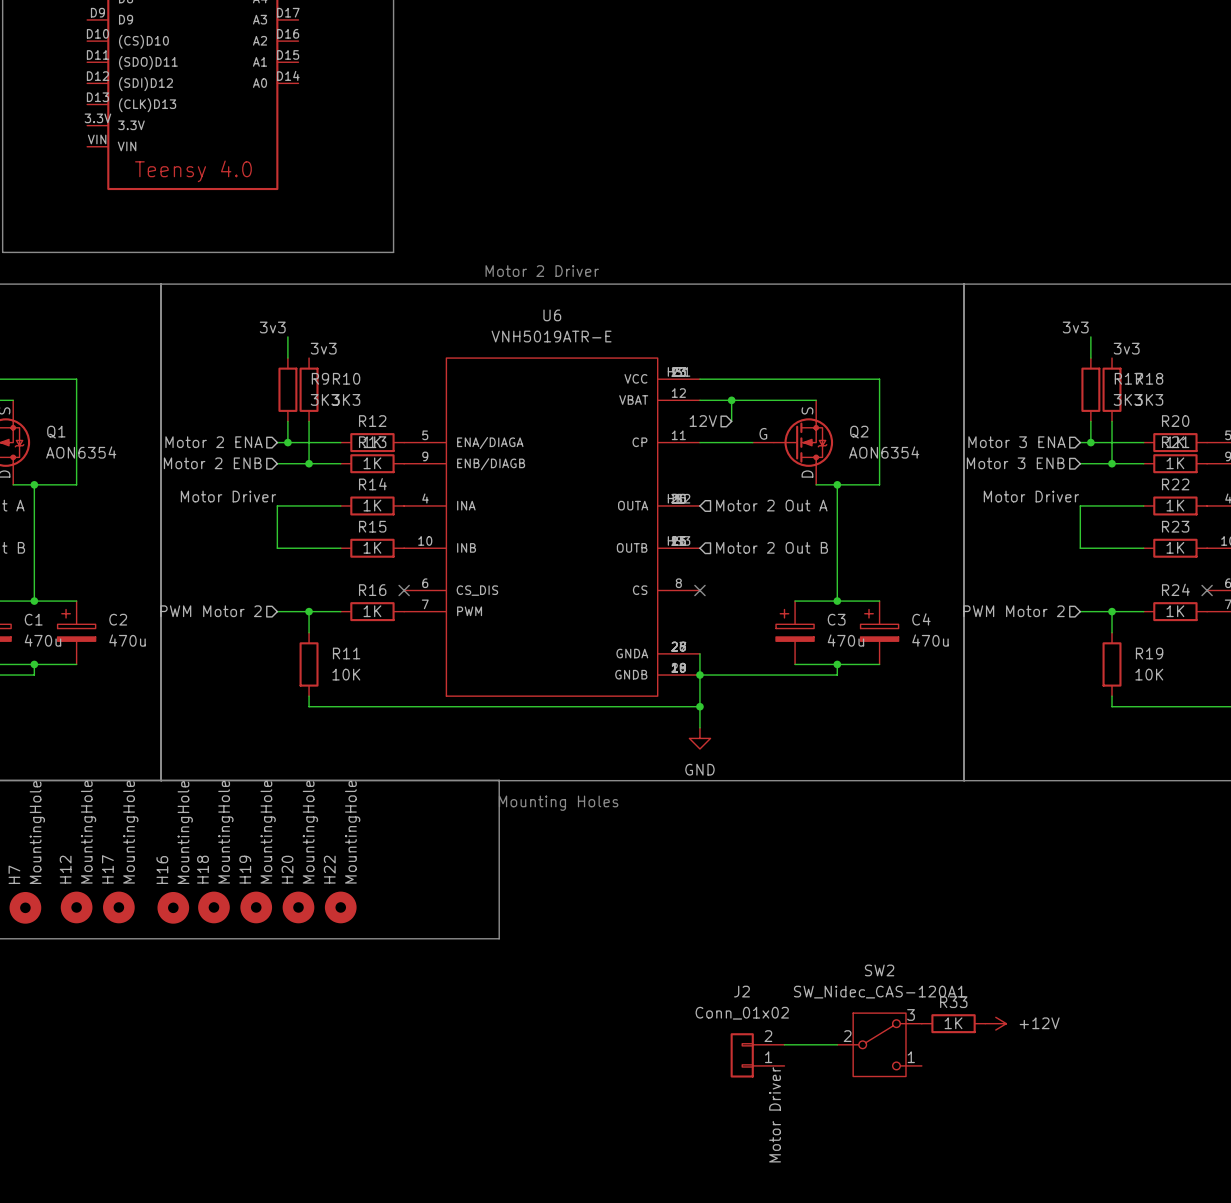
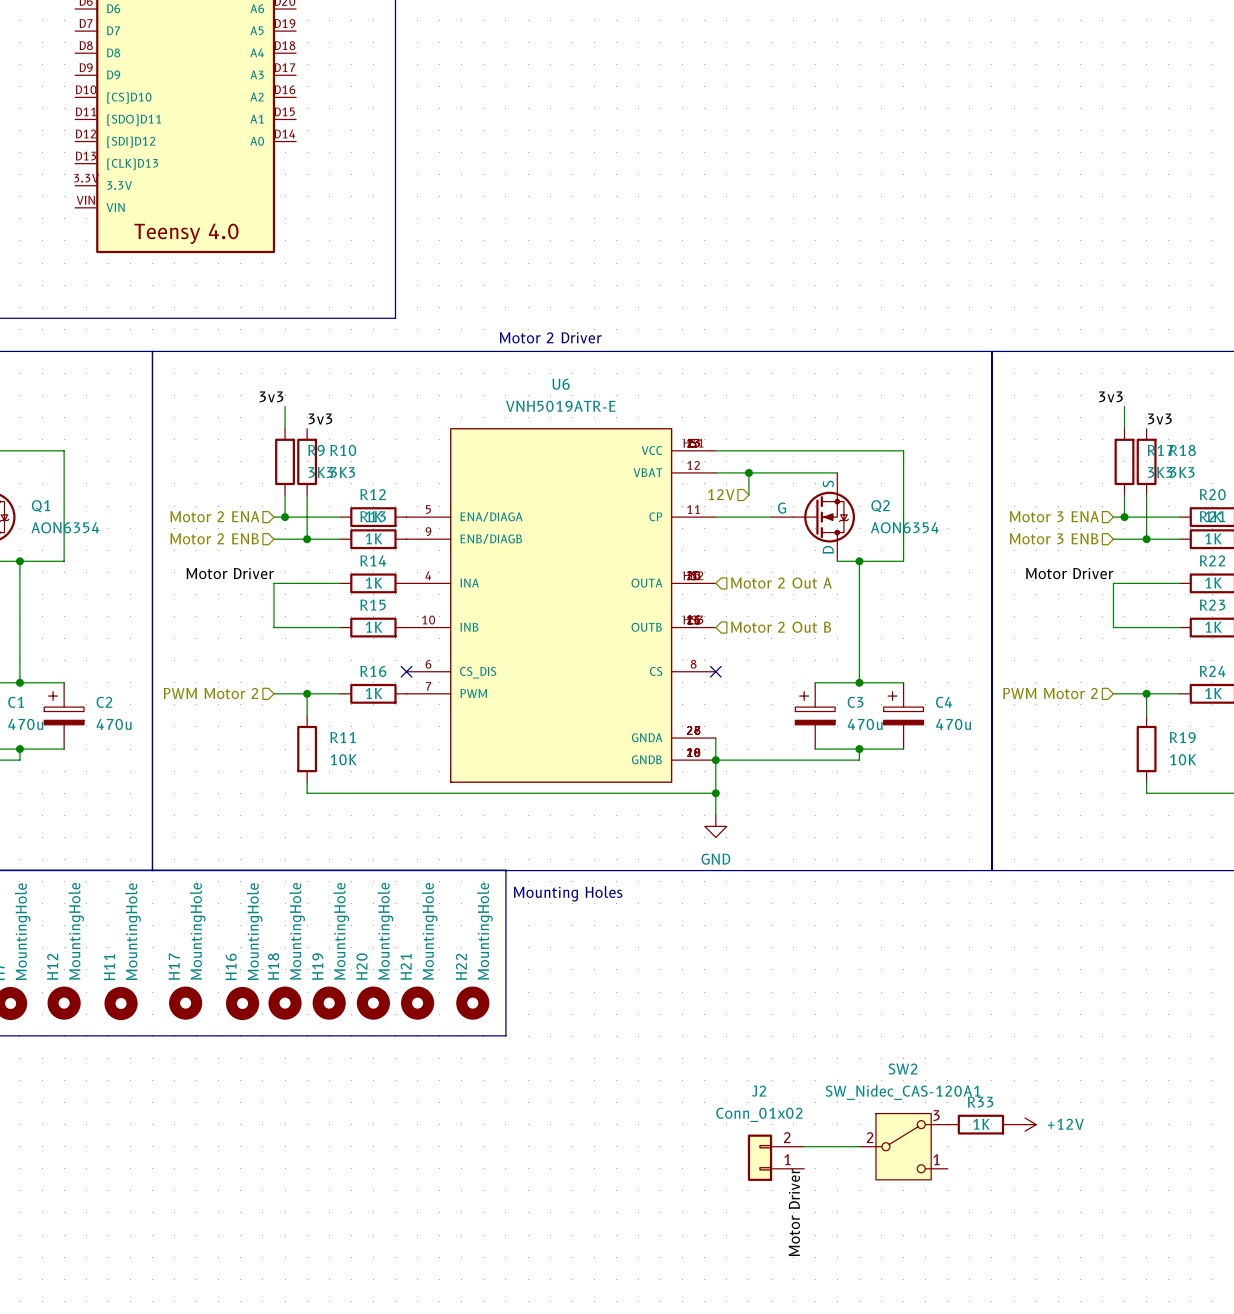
H17 position: (118, 907) -> (185, 1003)
H11: none -> MountingHole (121, 1003)
H16 position: (173, 907) -> (242, 1003)
H18 position: (213, 907) -> (285, 1003)
H19 position: (256, 907) -> (329, 1003)
H20 position: (298, 907) -> (373, 1003)
H22 position: (340, 907) -> (472, 1003)
H21: none -> MountingHole (417, 1003)

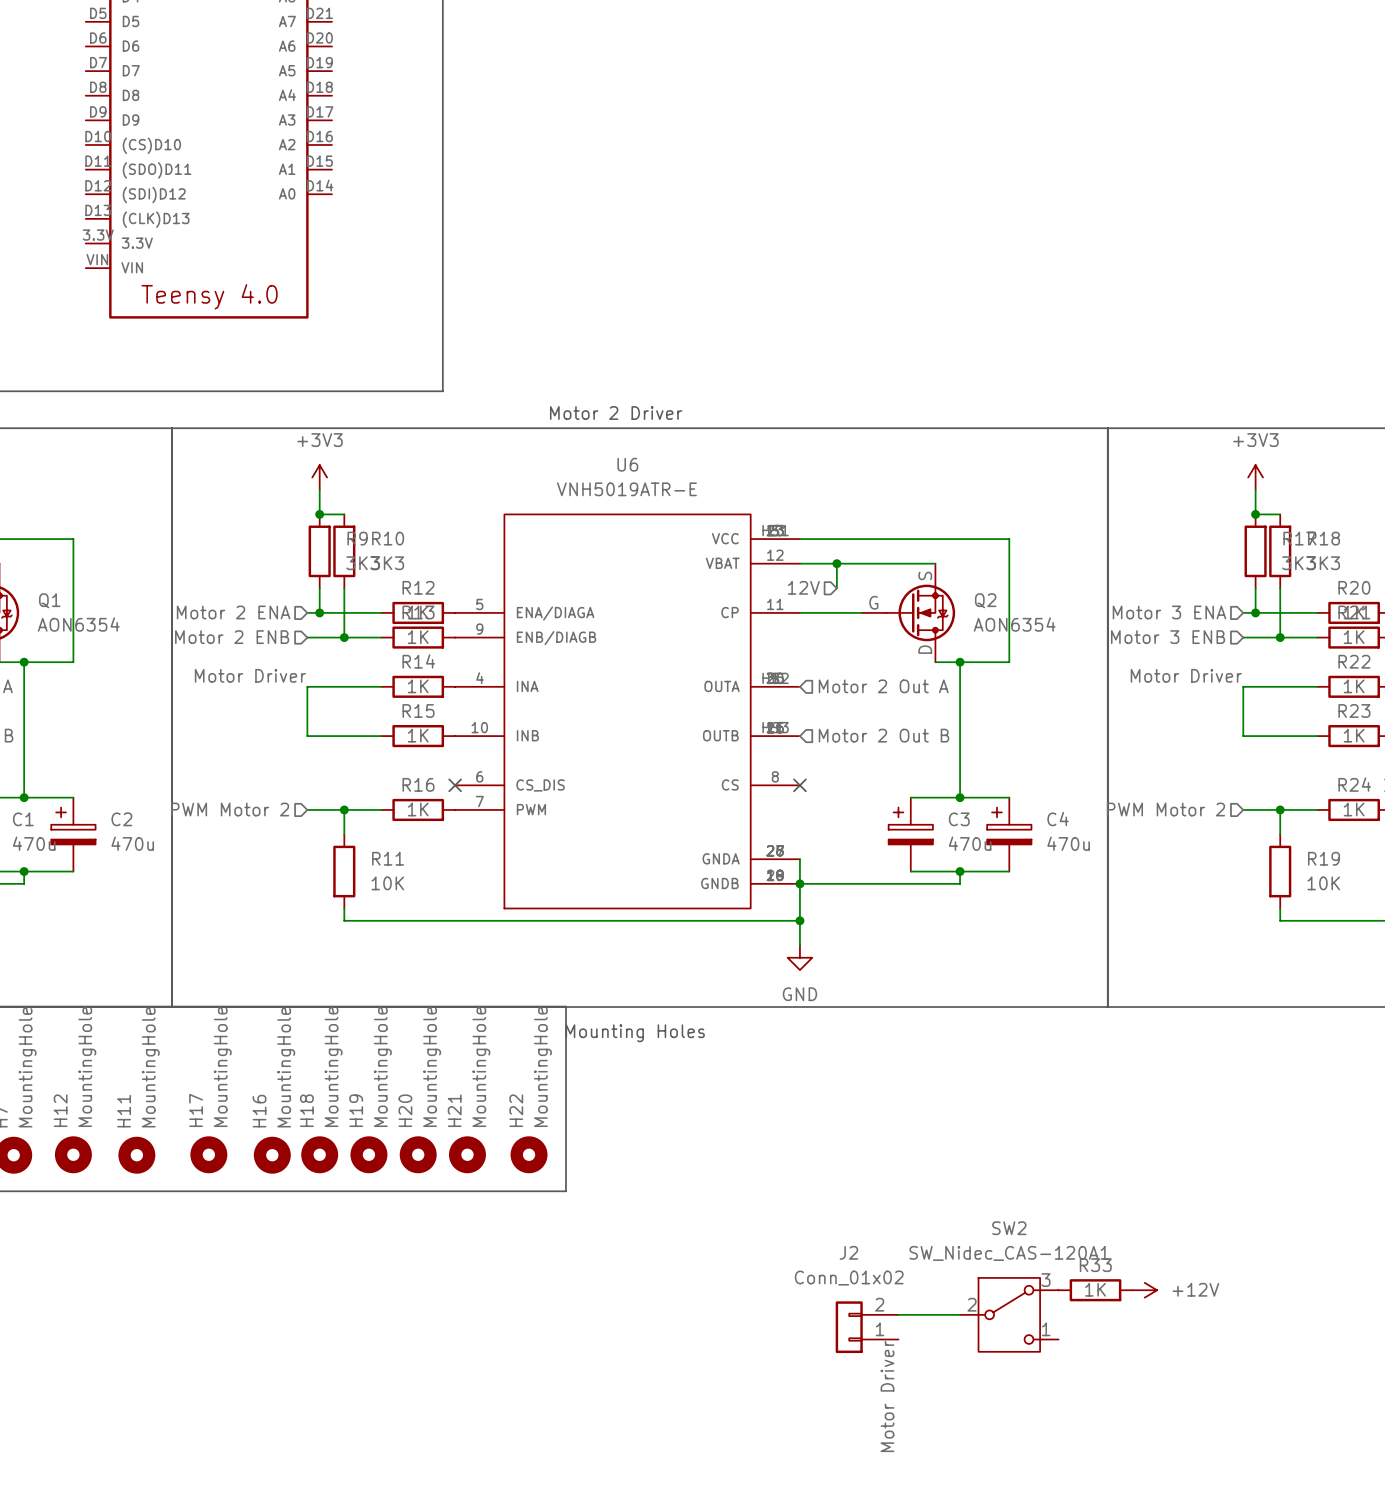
power symbol: none -> +3V3 (319, 477)
power symbol: none -> +3V3 (1255, 477)
label: 3v3 (271, 396) -> none
label: 3v3 (1110, 396) -> none
label: 3v3 (320, 419) -> none
label: 3v3 (1159, 419) -> none
wire: none -> (319, 514) (344, 514)
junction: none -> (319, 514)
wire: none -> (1255, 514) (1280, 514)
junction: none -> (1255, 514)

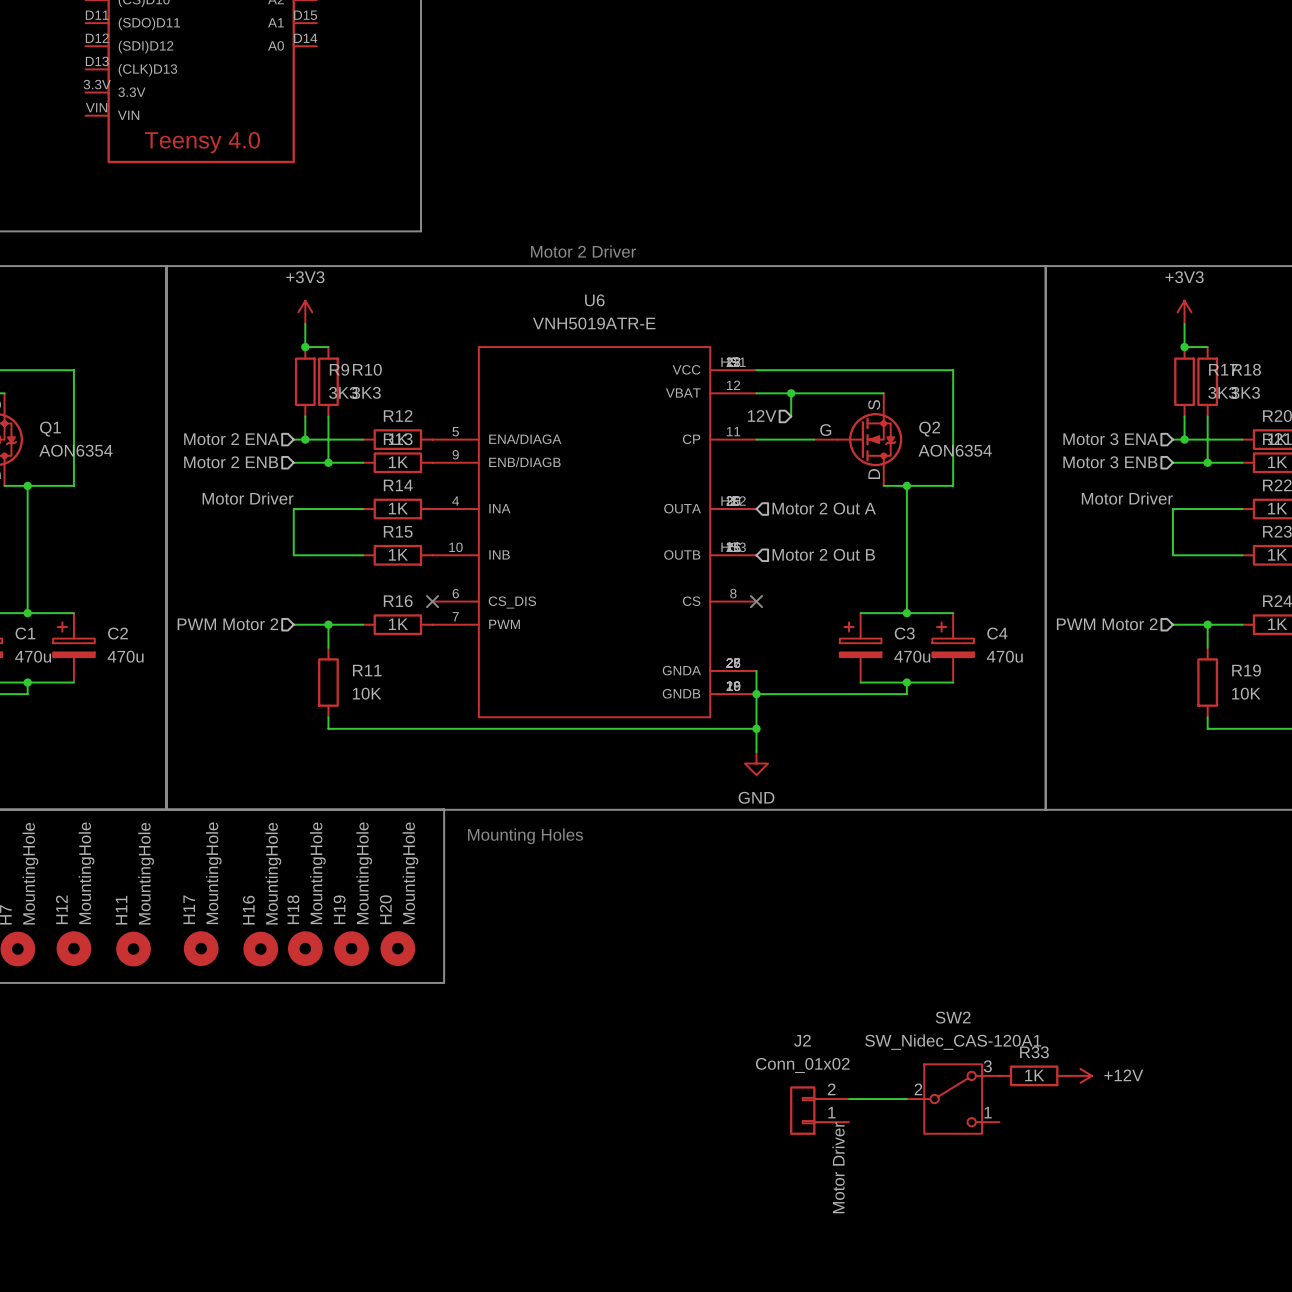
line: (467, 1006) (565, 1006) (565, 1191) (467, 1191) -> (444, 809) (444, 982)
text position: Mounting Holes (635, 1033) -> Mounting Holes (525, 836)
H21: MountingHole (467, 1154) -> none
H22: MountingHole (529, 1154) -> none

